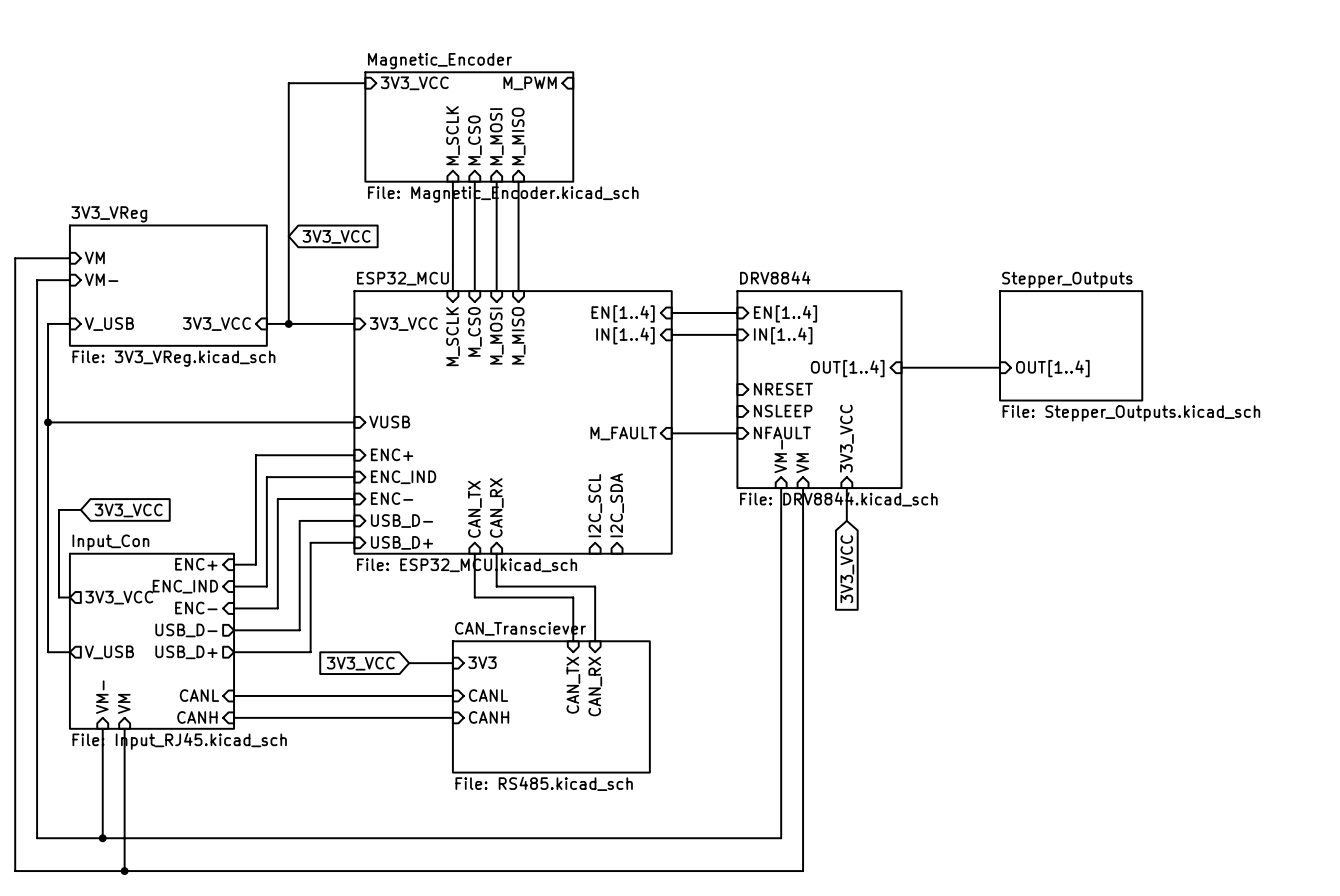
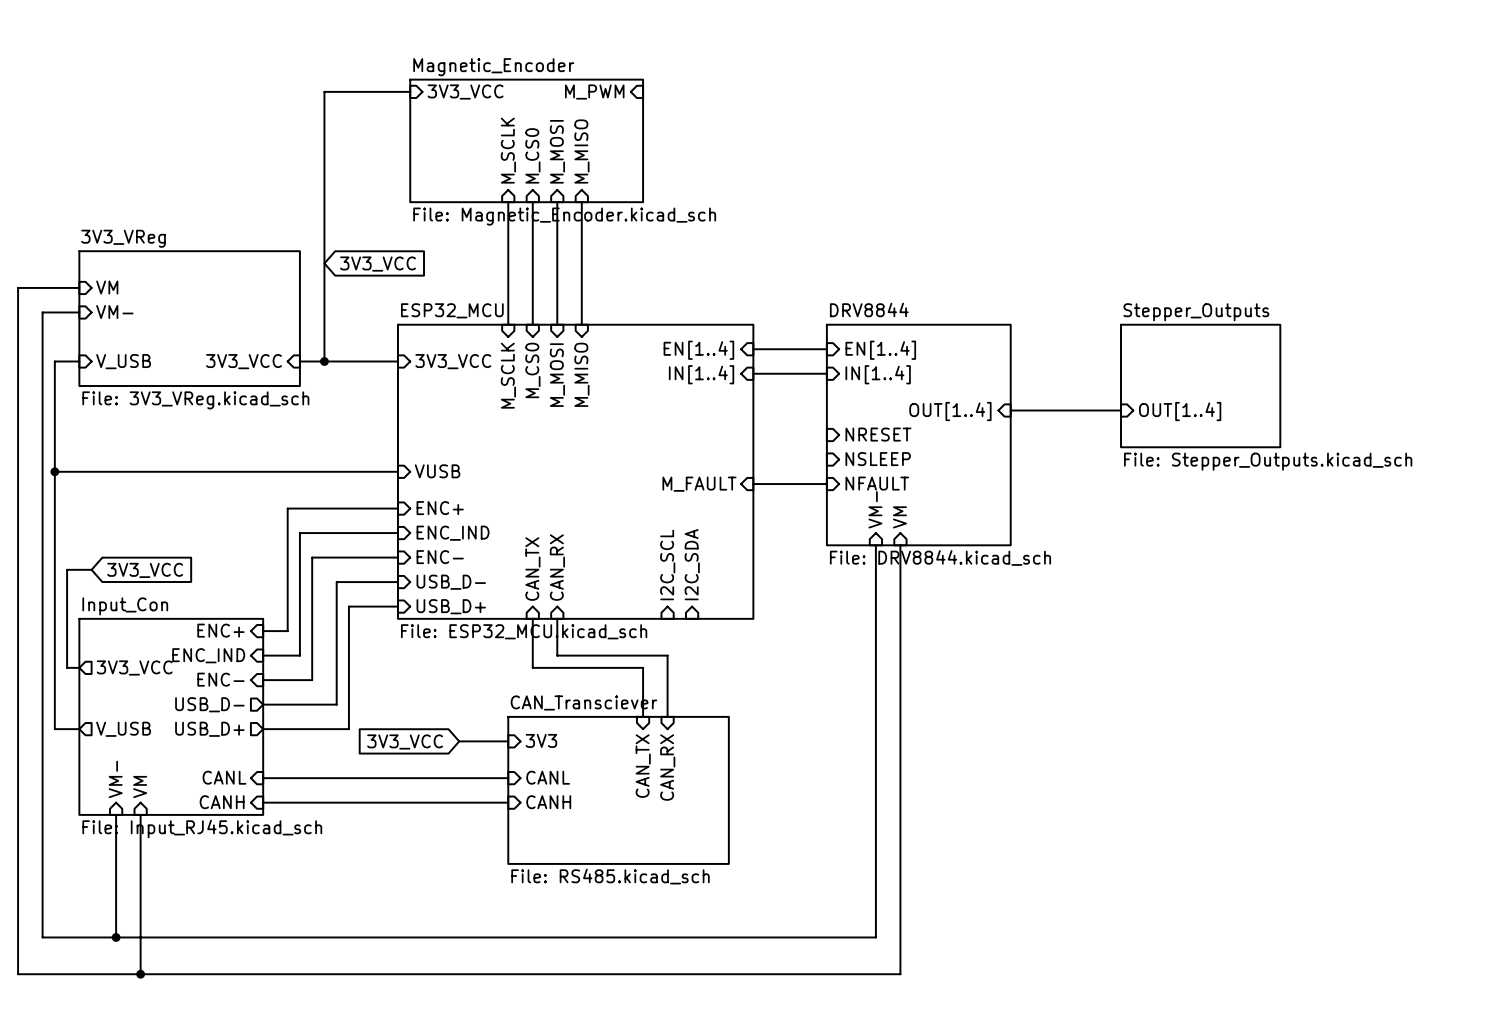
sheet pin: 3V3_VCC (846, 438) -> none
wire: (846, 488) (846, 520) -> none
global label: 3V3_VCC (847, 569) -> none

